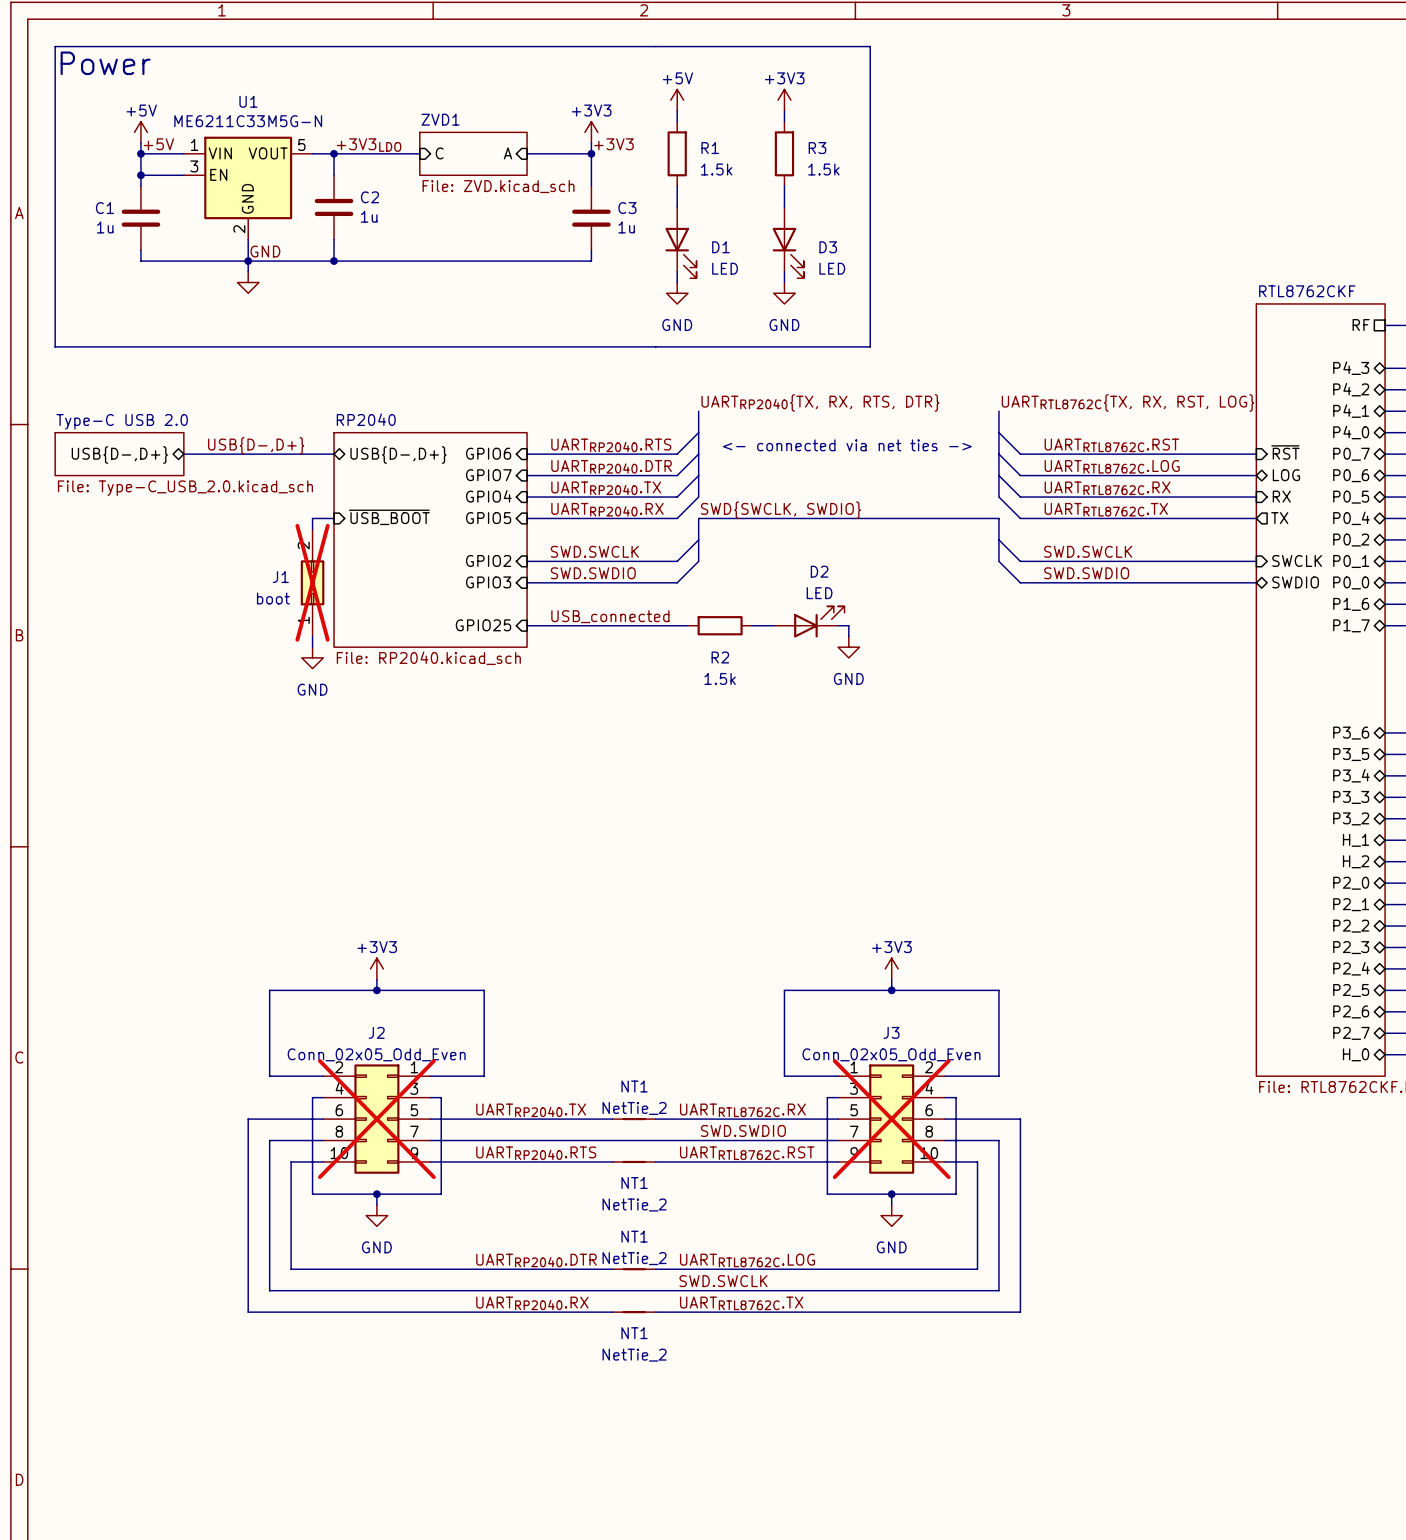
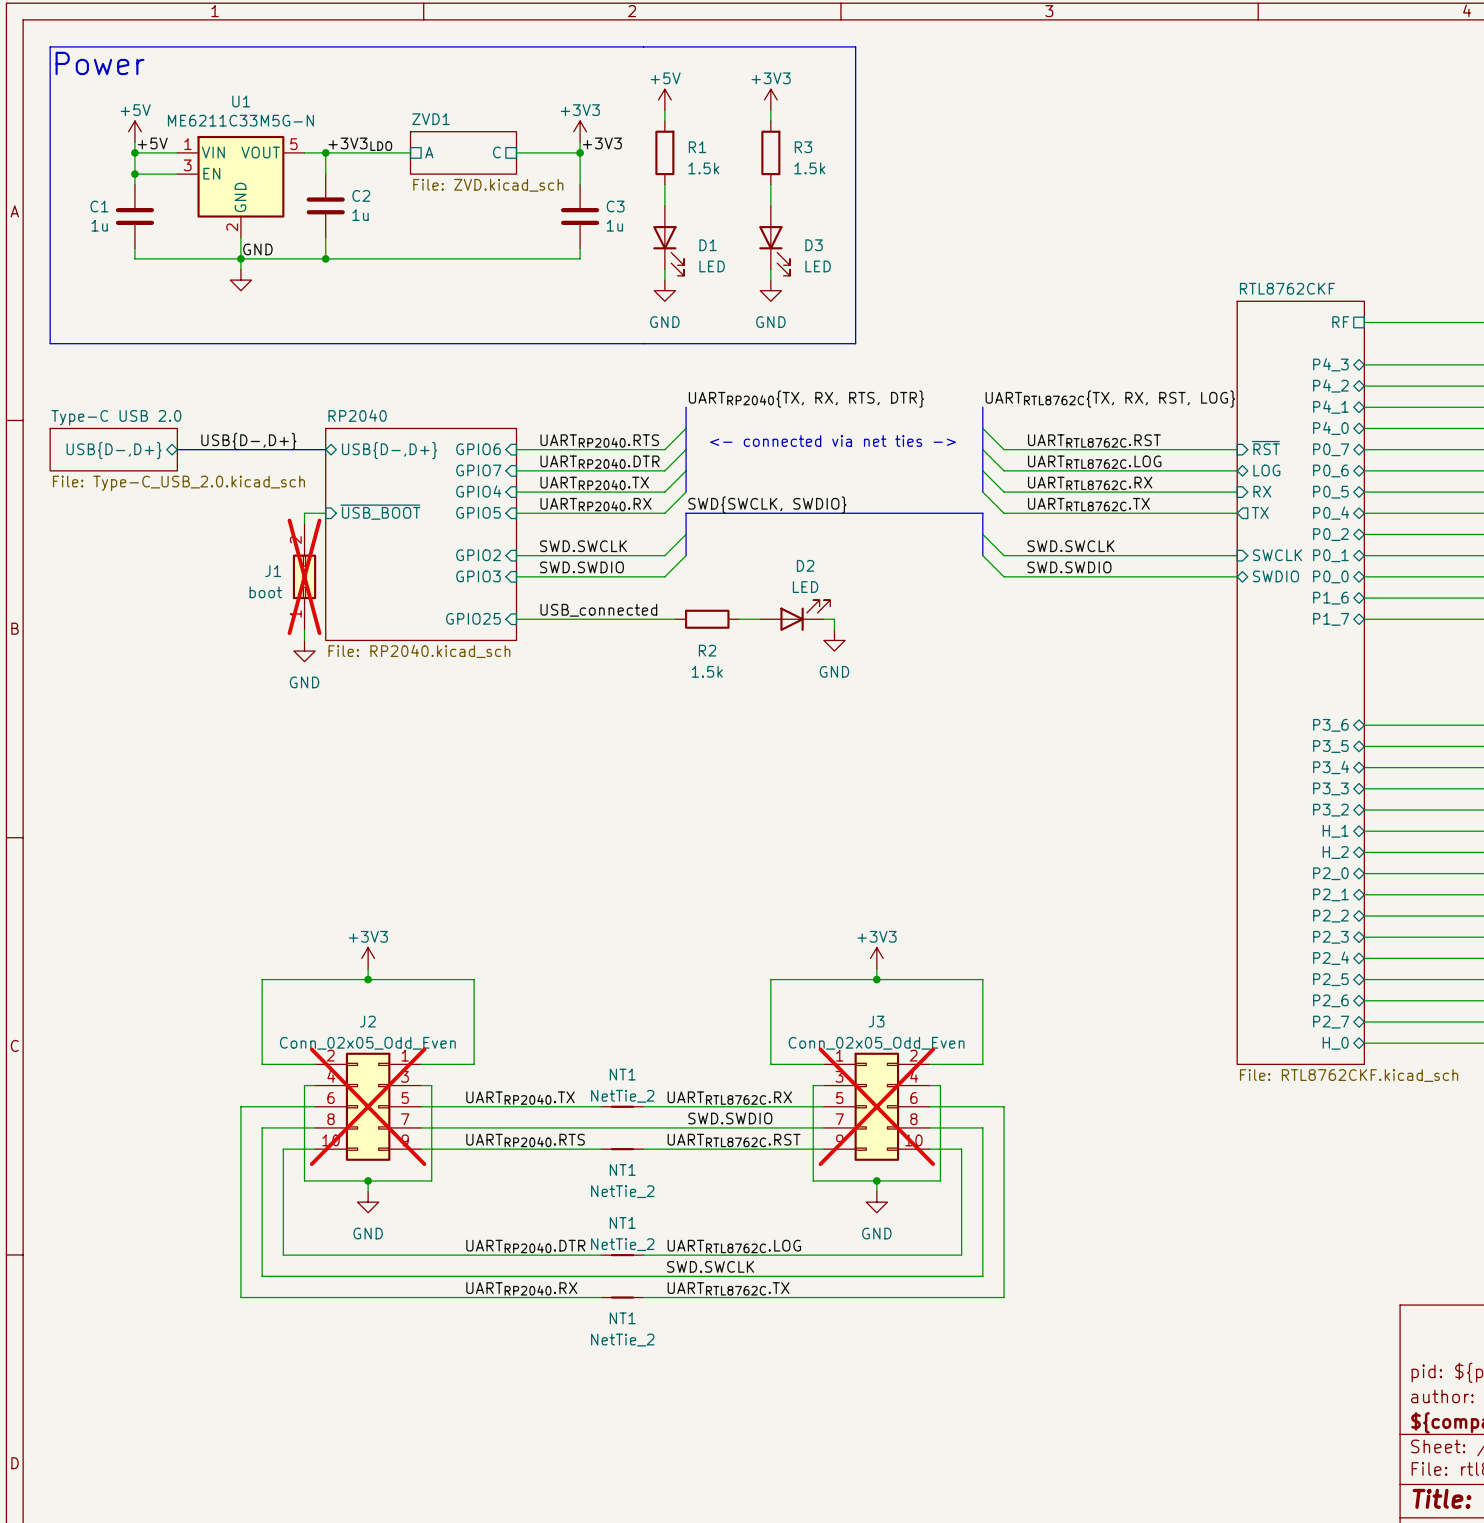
sheet pin shape: input (439, 153) -> passive (429, 152)
sheet pin: C (439, 153) -> A (429, 152)
sheet pin shape: input (507, 153) -> passive (496, 152)
sheet pin: A (507, 153) -> C (496, 152)

